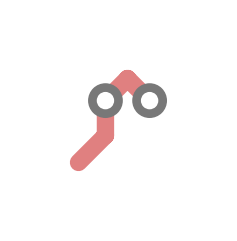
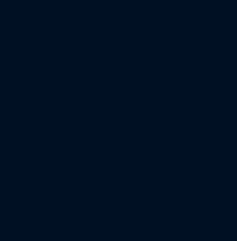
via: (105, 100) -> none
track: (149, 100) (127, 78) (105, 100) (105, 135) (78, 162) -> none
via: (149, 100) -> none

